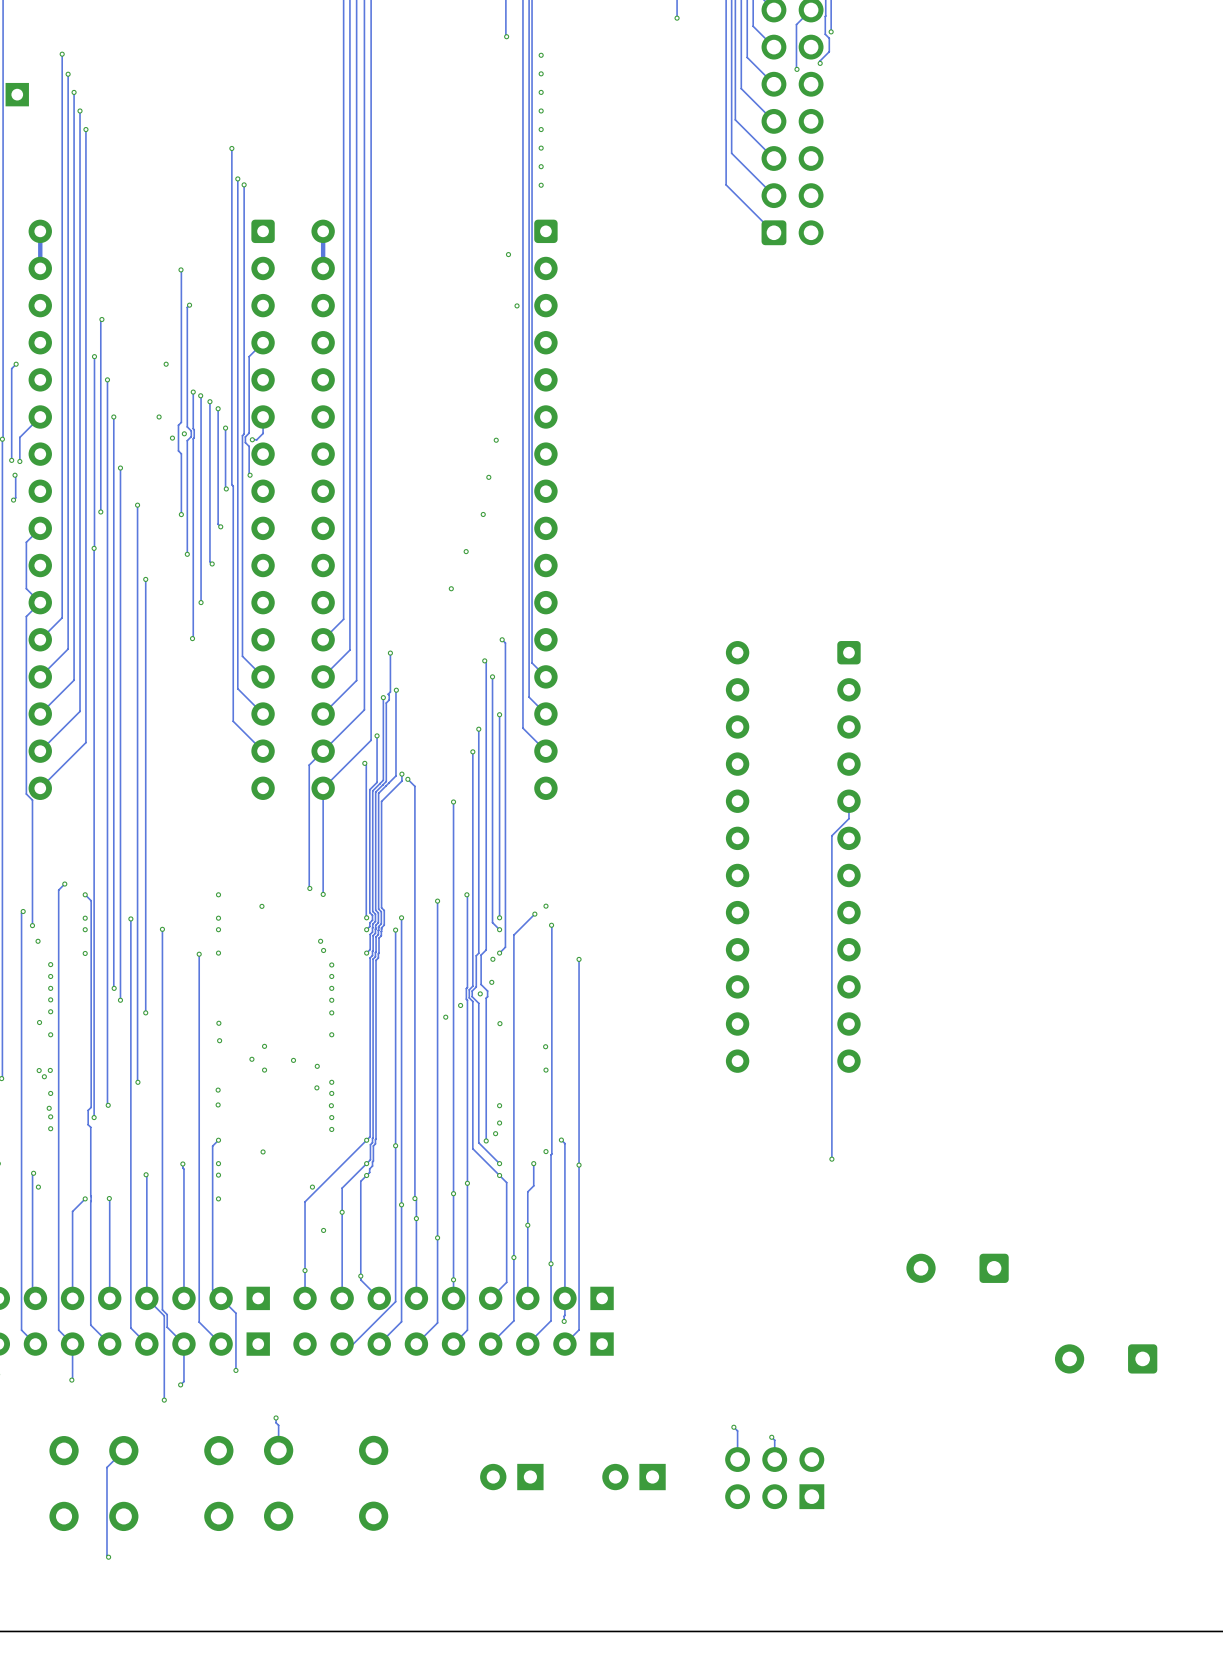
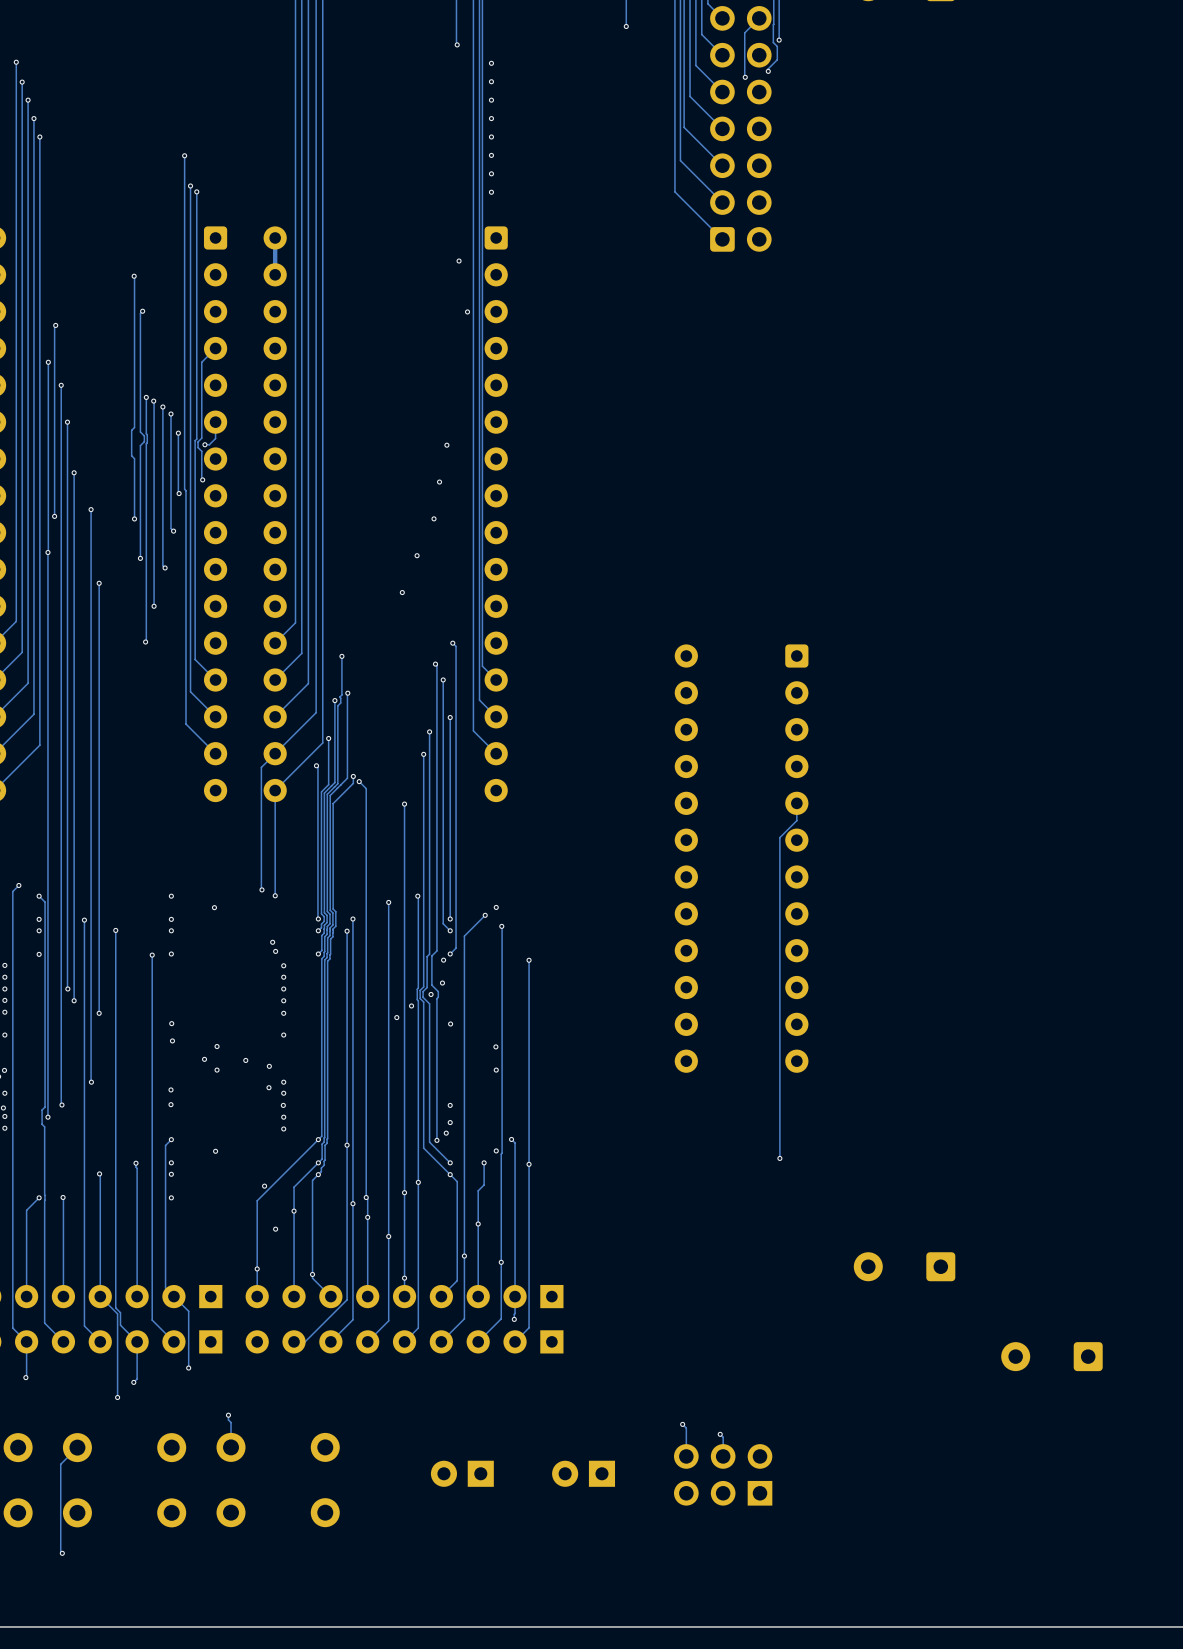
via: (166, 364) -> none
via: (159, 416) -> none
via: (184, 433) -> none
via: (172, 438) -> none

